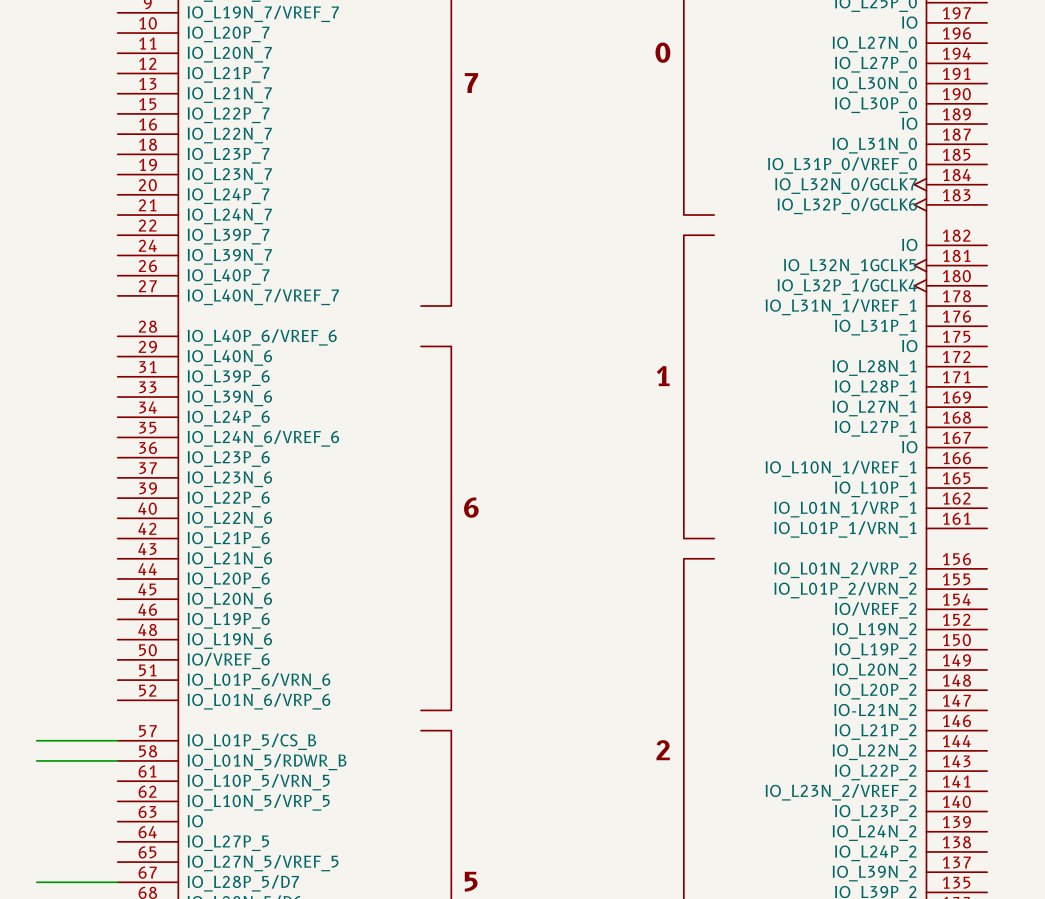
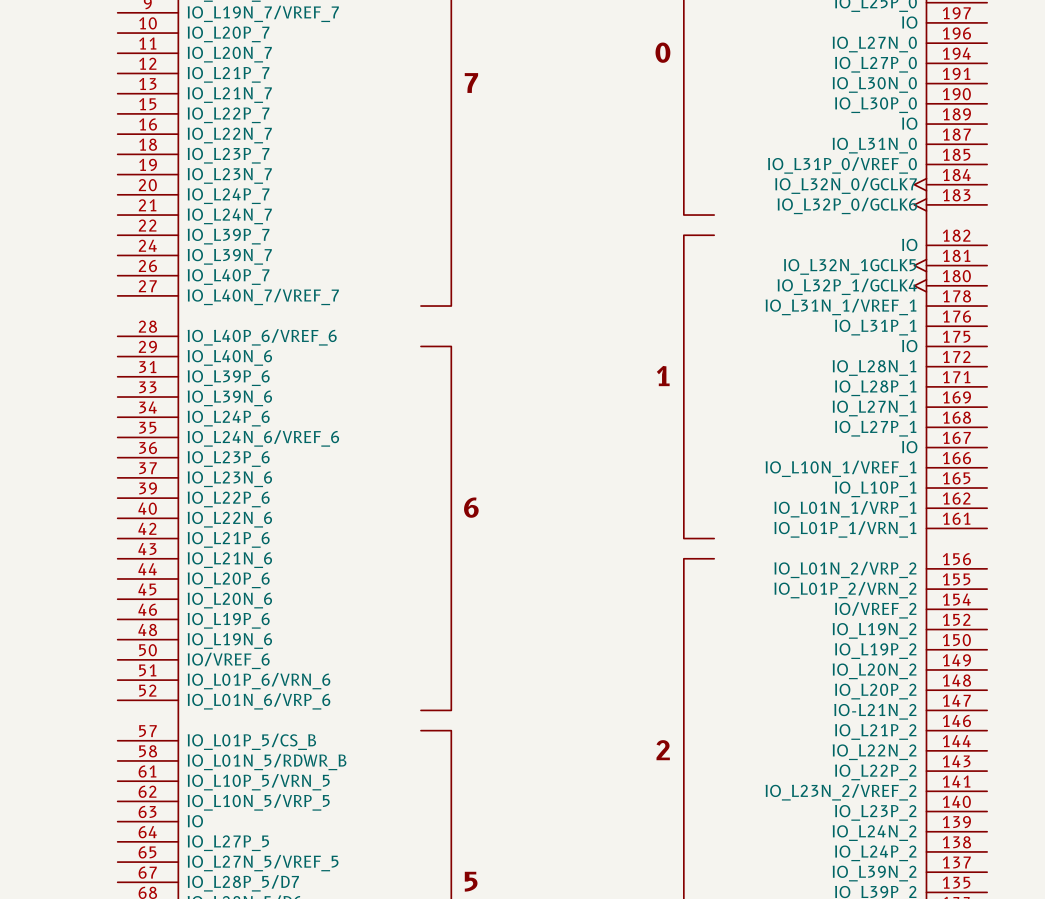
wire: (36, 740) (117, 740) -> none
wire: (36, 760) (117, 760) -> none
wire: (36, 882) (117, 882) -> none

